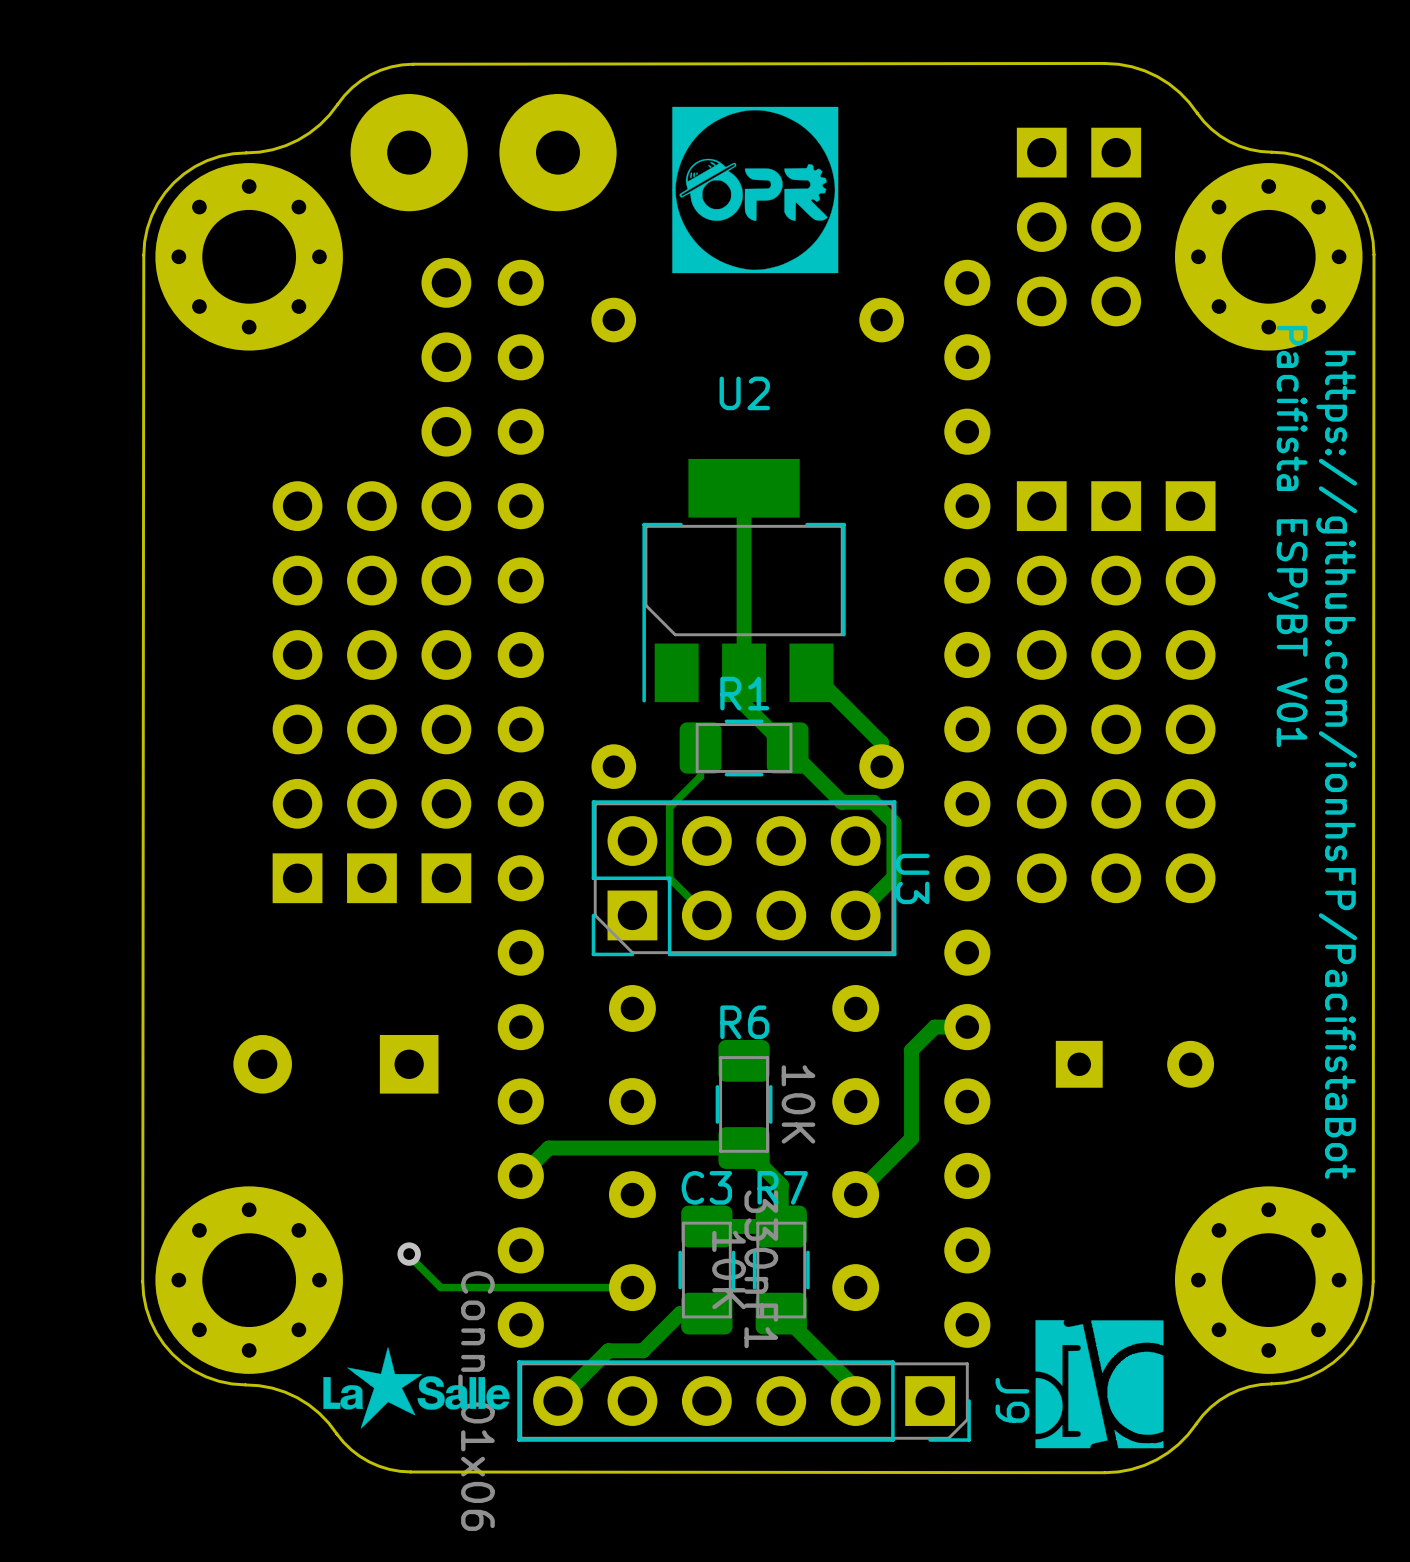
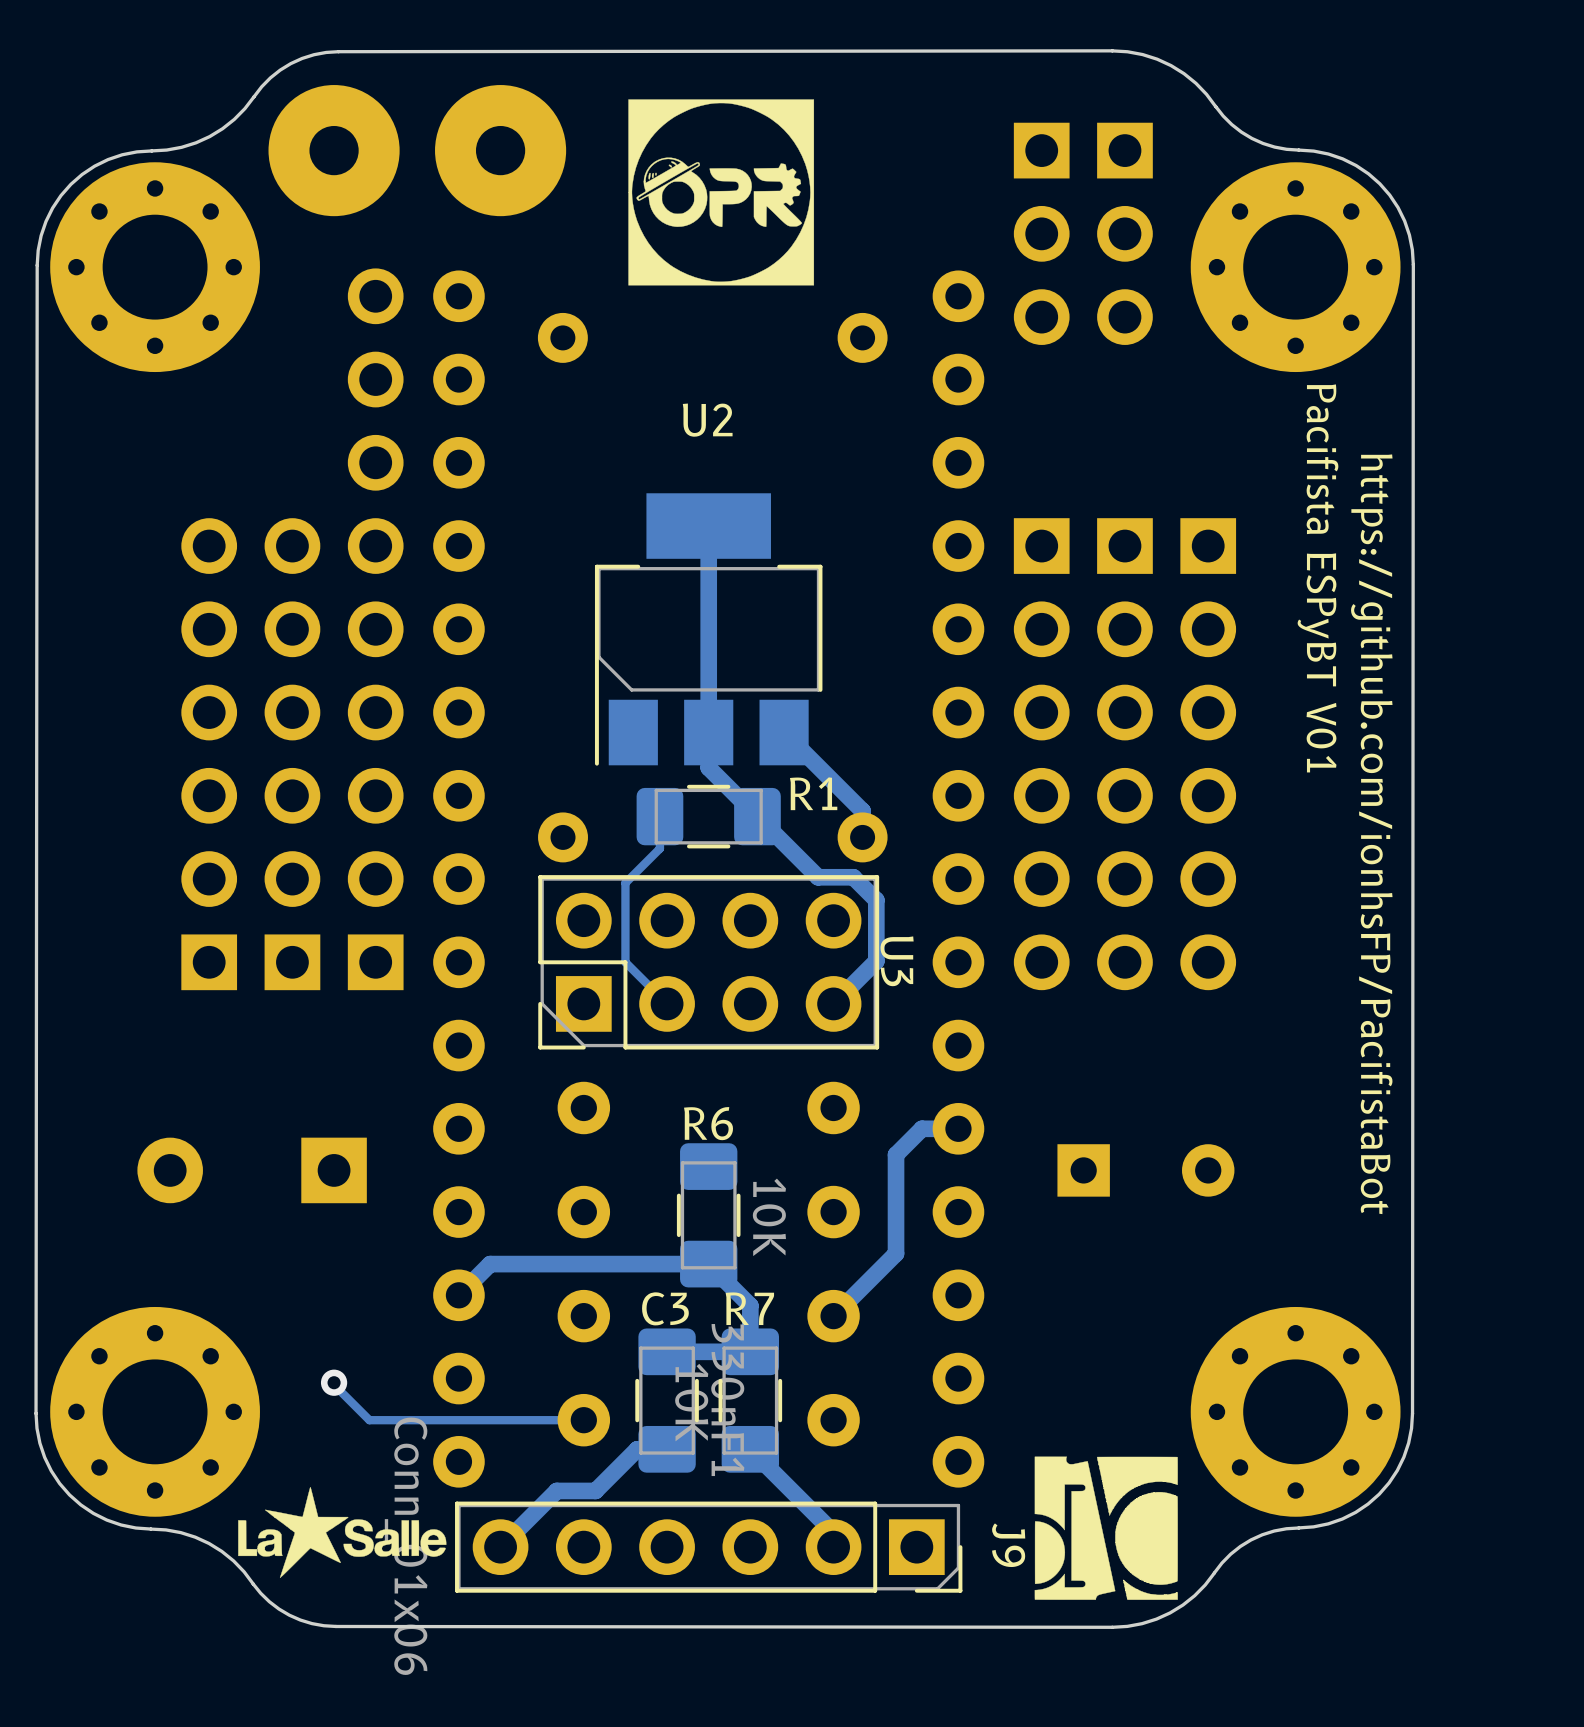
R1 name position: R1 (744, 693) -> R1 (813, 793)

